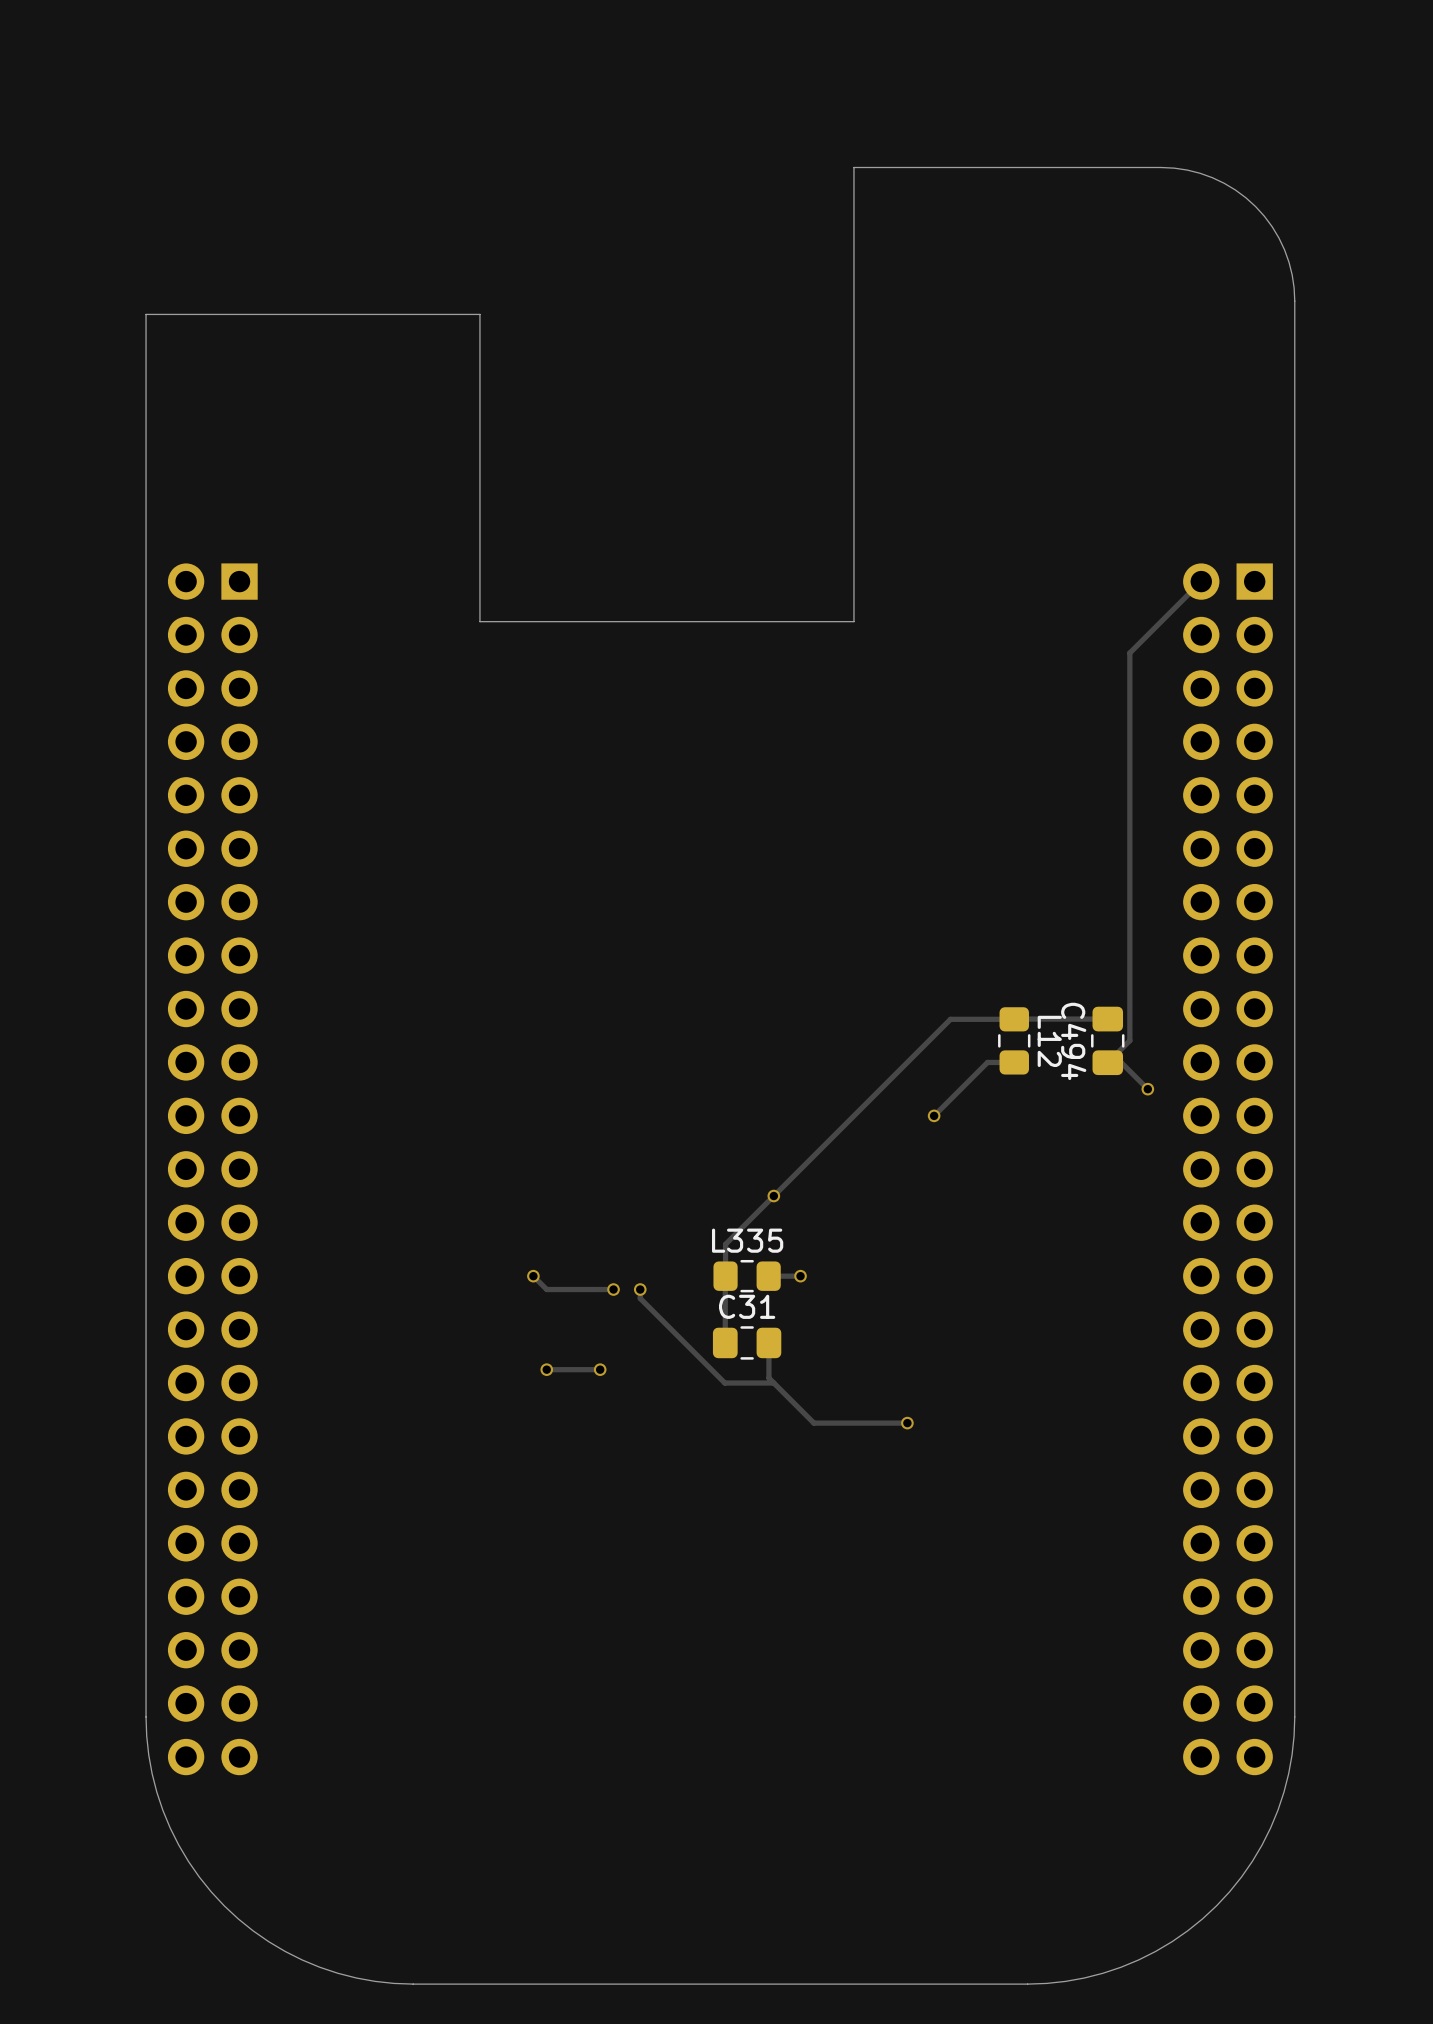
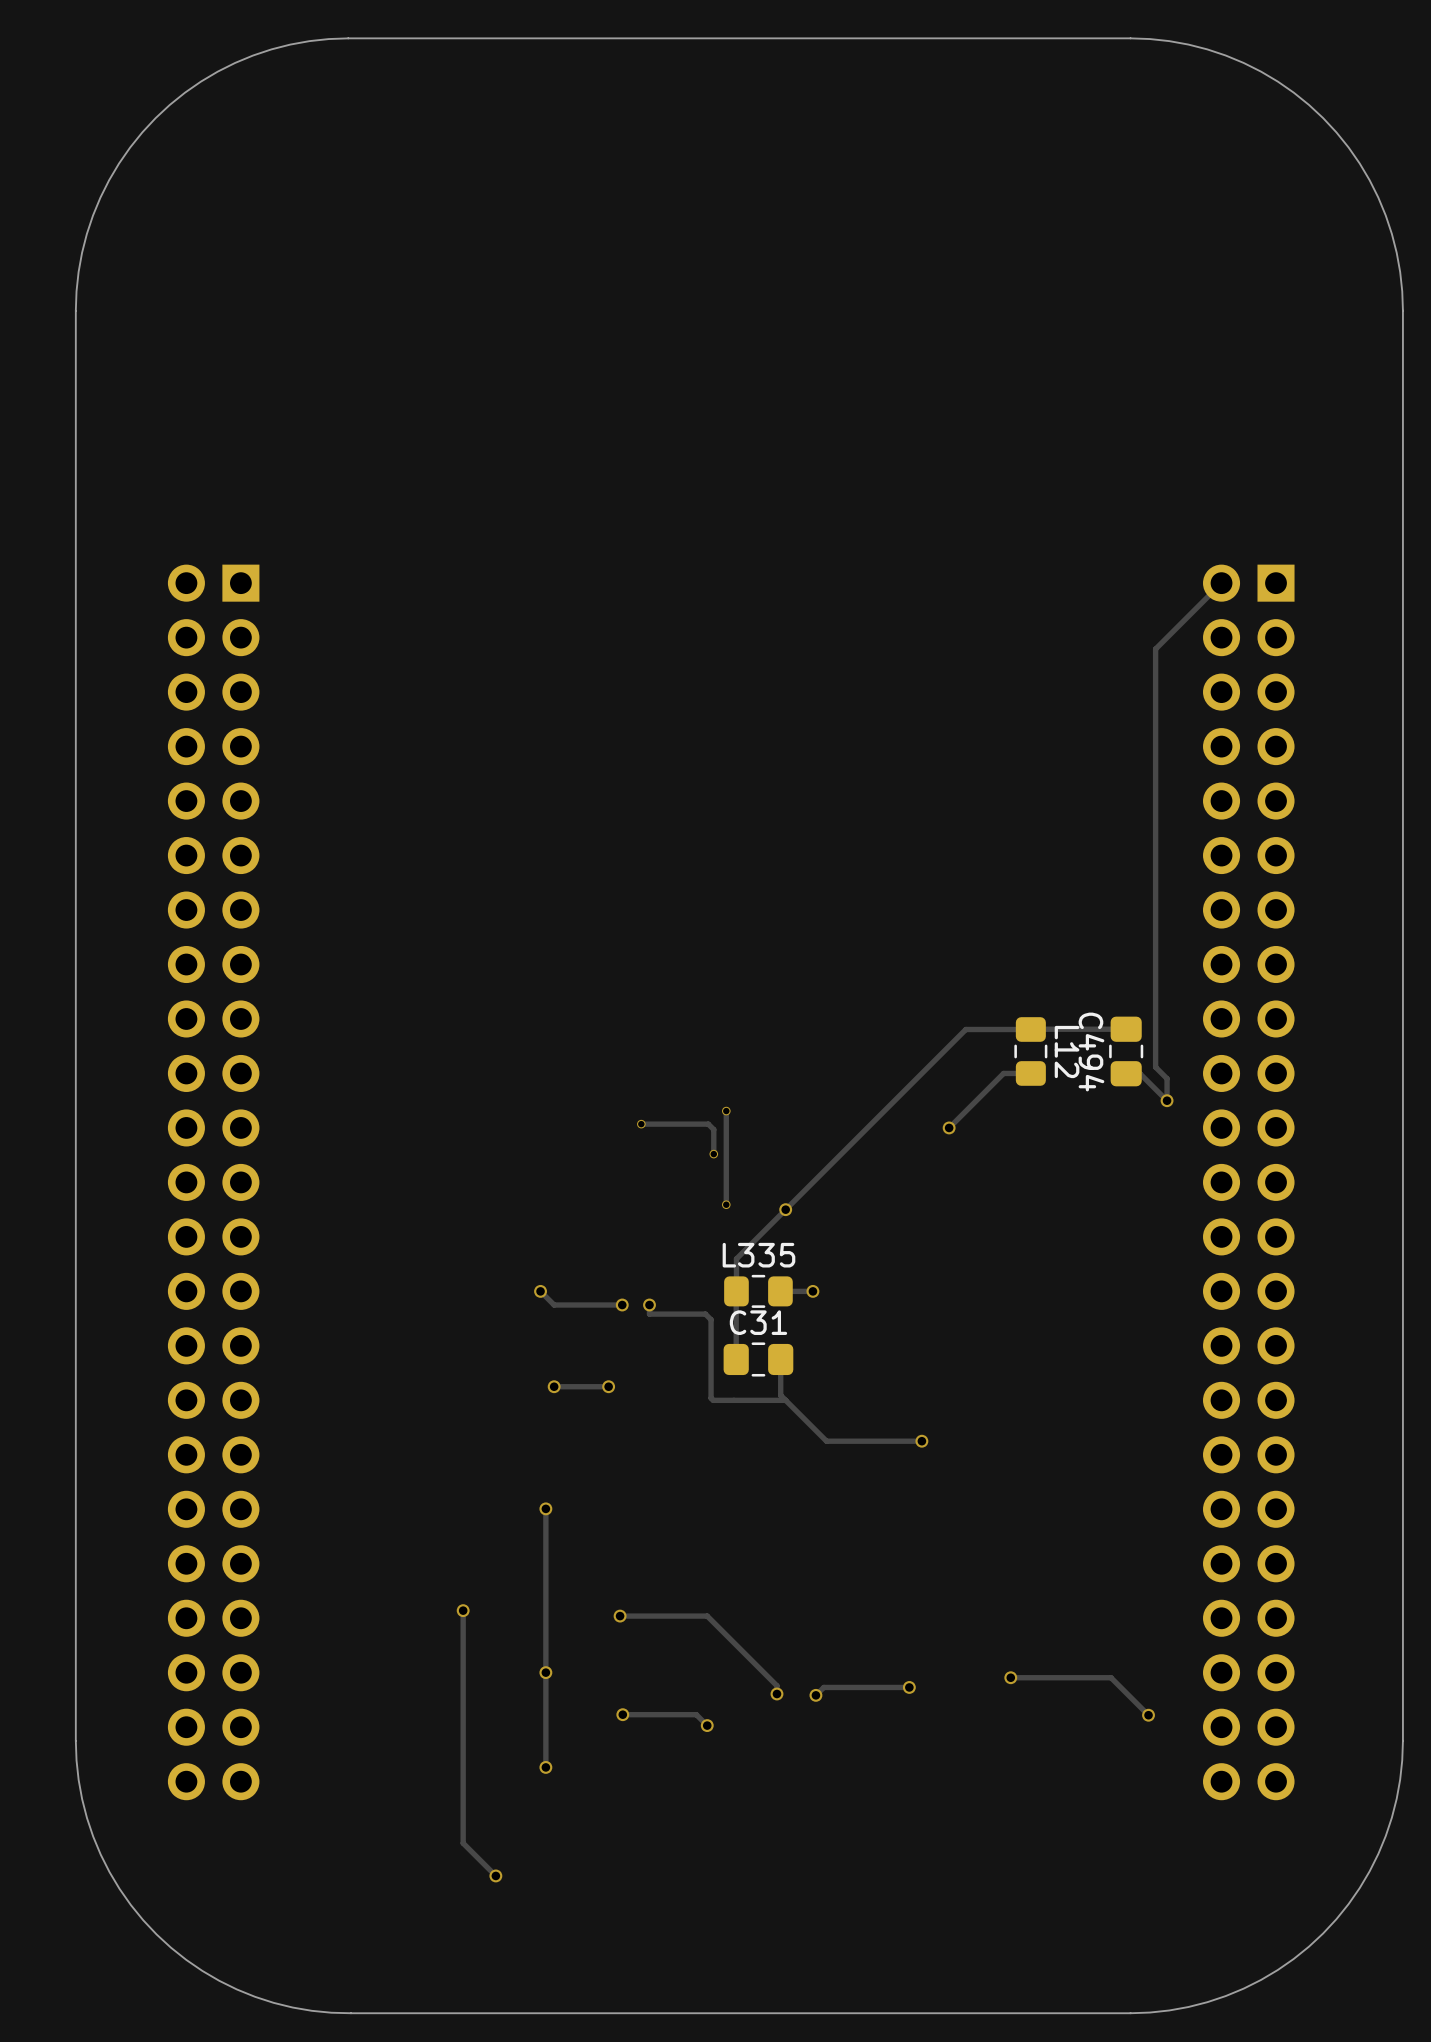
track: (1136, 646) (1129, 652) (1129, 1040) (1107, 1062) -> (1155, 649) (1155, 1067) (1167, 1078) (1167, 1100)
track: none -> (726, 1111) (726, 1204)
via: none -> (726, 1111)
track: none -> (641, 1124) (708, 1124) (713, 1129) (713, 1154)
via: none -> (641, 1124)
via: none -> (713, 1154)
via: none -> (726, 1204)
track: (640, 1298) (724, 1383) -> (649, 1314) (705, 1314) (711, 1319) (711, 1398) (713, 1400) (735, 1400)
track: none -> (545, 1508) (545, 1767)
via: none -> (545, 1508)
track: none -> (463, 1610) (463, 1843) (495, 1875)
via: none -> (463, 1610)
track: none -> (620, 1616) (707, 1616) (776, 1685) (776, 1693)
via: none -> (620, 1616)
via: none -> (545, 1672)
track: none -> (1010, 1677) (1111, 1677) (1148, 1715)
via: none -> (1010, 1677)
track: none -> (909, 1687) (823, 1687) (815, 1695)
via: none -> (909, 1687)
via: none -> (776, 1693)
via: none -> (815, 1695)
track: none -> (622, 1714) (696, 1714) (707, 1725)
via: none -> (622, 1714)
via: none -> (1148, 1715)
via: none -> (707, 1725)
via: none -> (545, 1767)
via: none -> (495, 1875)
board edge: (1027, 1984) (1084, 1978) (1138, 1959) (1172, 1941) (1216, 1905) (1252, 1861) (1270, 1827) (1288, 1773) (1294, 1736) (1294, 287) (1289, 262) (1278, 238) (1255, 206) (1224, 183) (1199, 173) (1174, 168) (853, 167) (853, 621) (479, 621) (479, 314) (146, 314) (146, 1716) (148, 1754) (162, 1810) (178, 1844) (211, 1891) (238, 1918) (285, 1951) (319, 1967) (356, 1978) (413, 1984) -> (1044, 2013) (1149, 2012) (1188, 2007) (1243, 1988) (1293, 1958) (1336, 1919) (1369, 1871) (1391, 1817) (1402, 1760) (1402, 310) (1400, 271) (1391, 234) (1369, 180) (1348, 147) (1323, 118) (1277, 81) (1243, 62) (1207, 49) (1149, 39) (348, 38) (309, 41) (271, 49) (235, 62) (184, 92) (155, 118) (130, 147) (109, 180) (93, 215) (82, 252) (75, 310) (75, 1740) (78, 1779) (93, 1836) (109, 1872) (143, 1920) (186, 1959) (236, 1989) (292, 2007) (331, 2012) (417, 2013)

